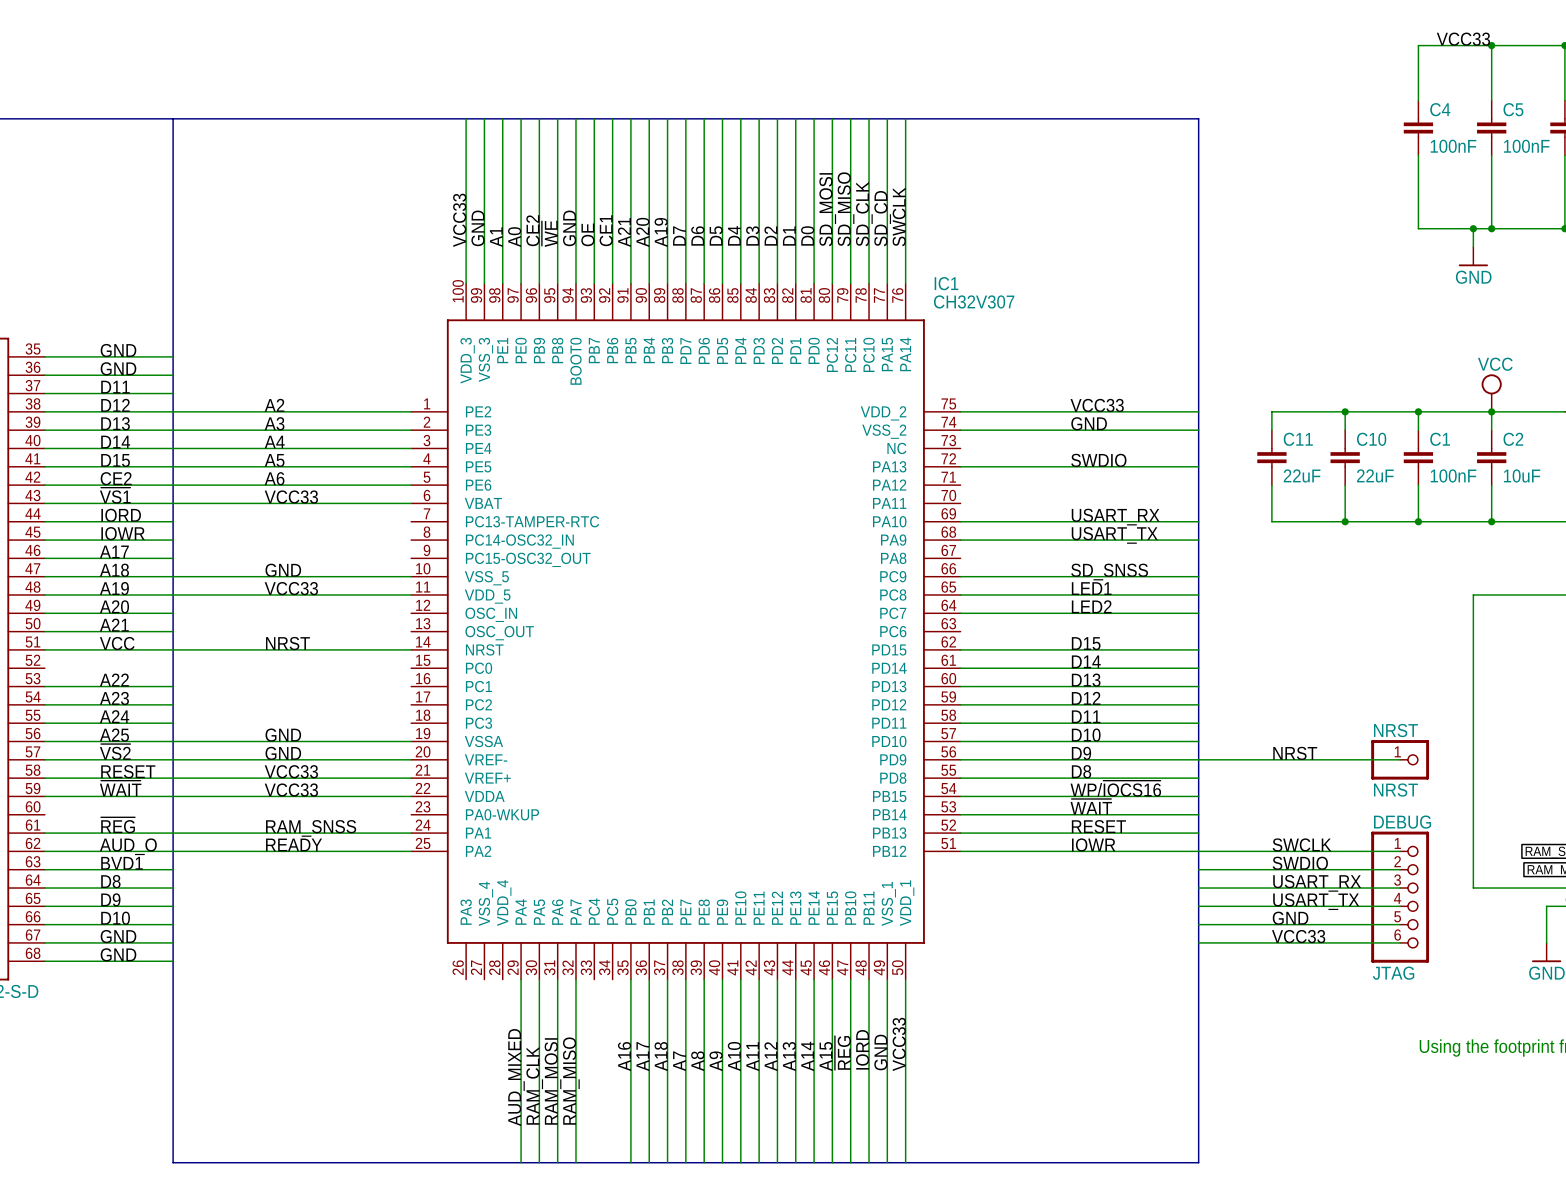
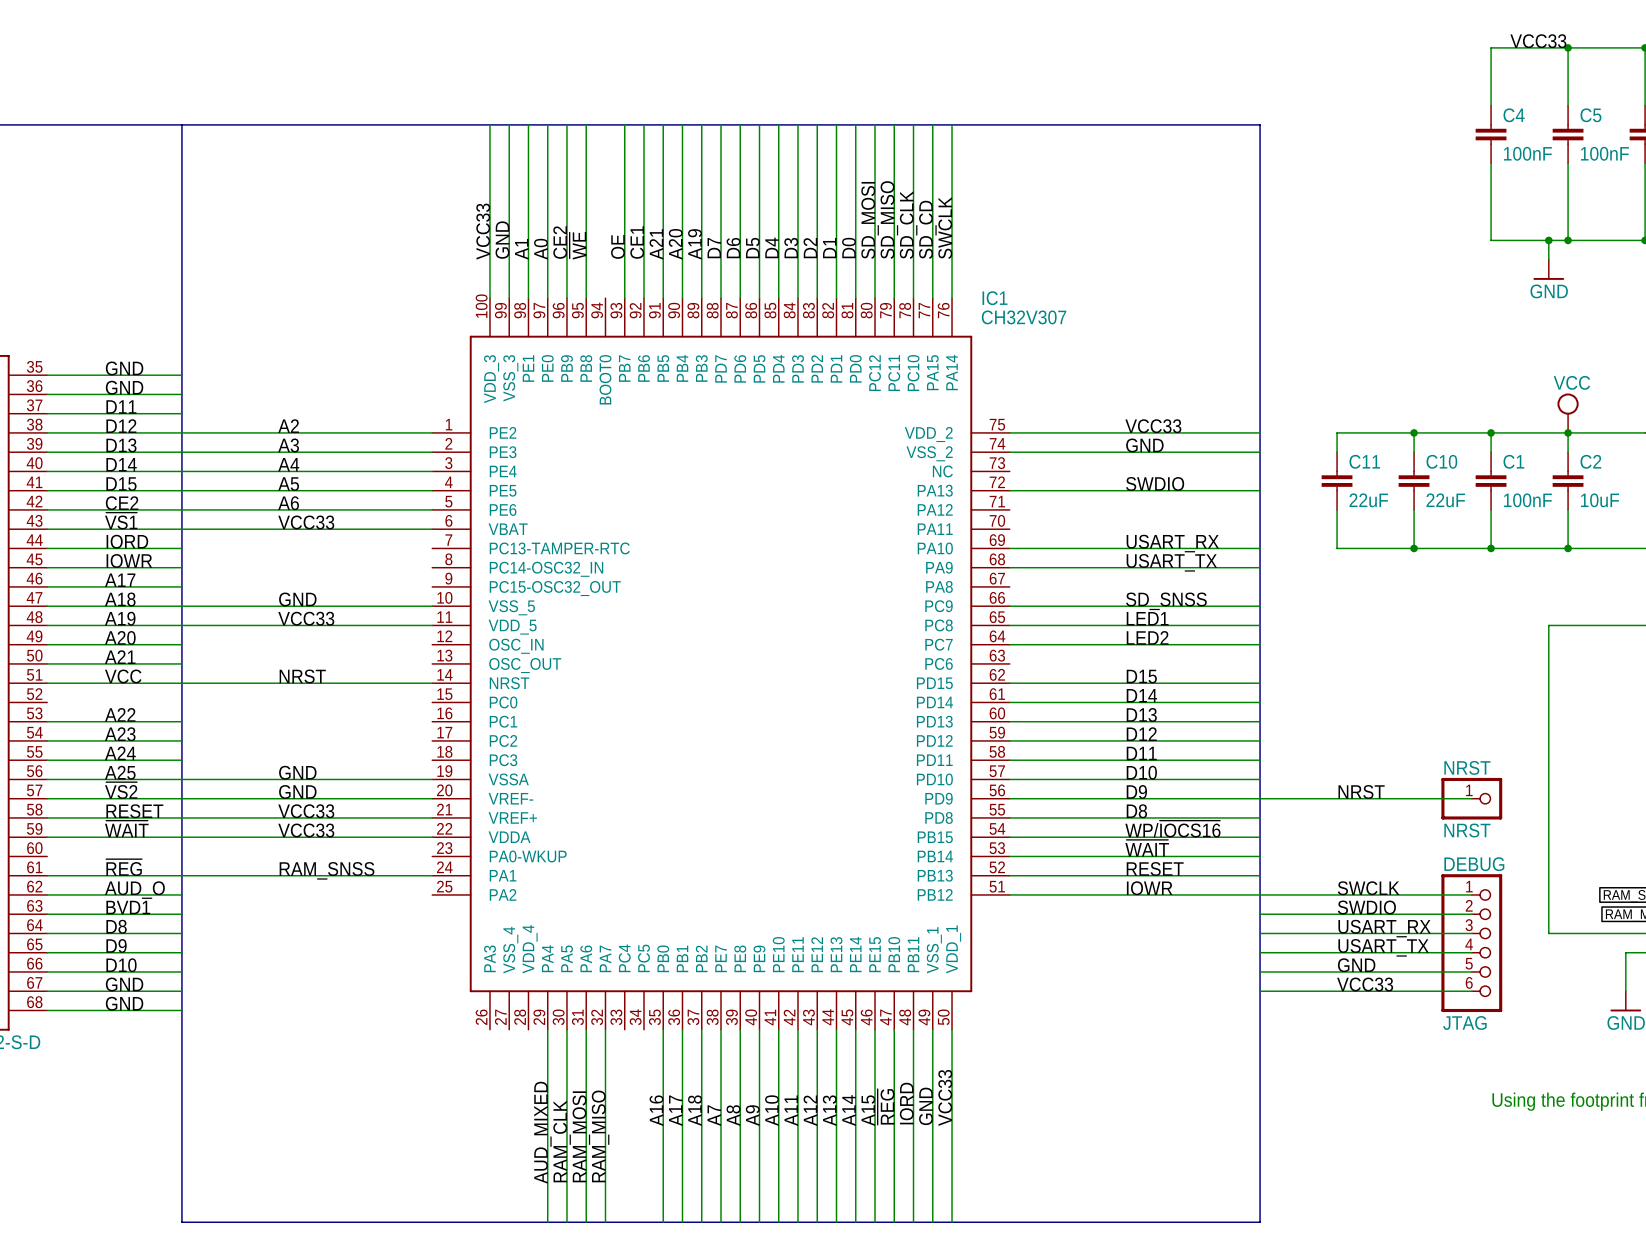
wire: (575, 118) (575, 283) -> none
label: GND (569, 228) -> none
label: READY (294, 844) -> none
wire: (173, 851) (411, 851) -> none

